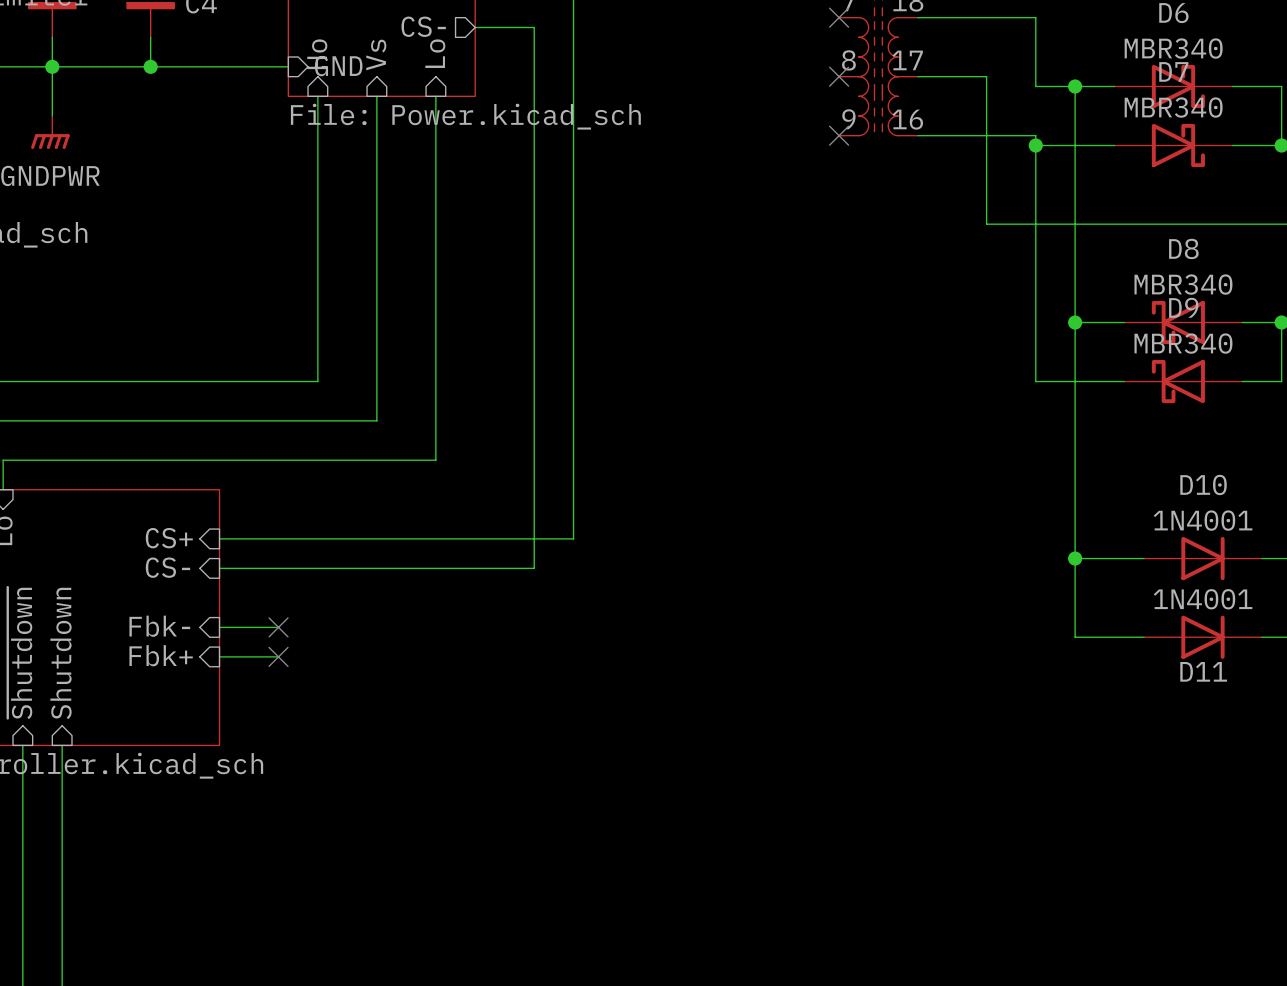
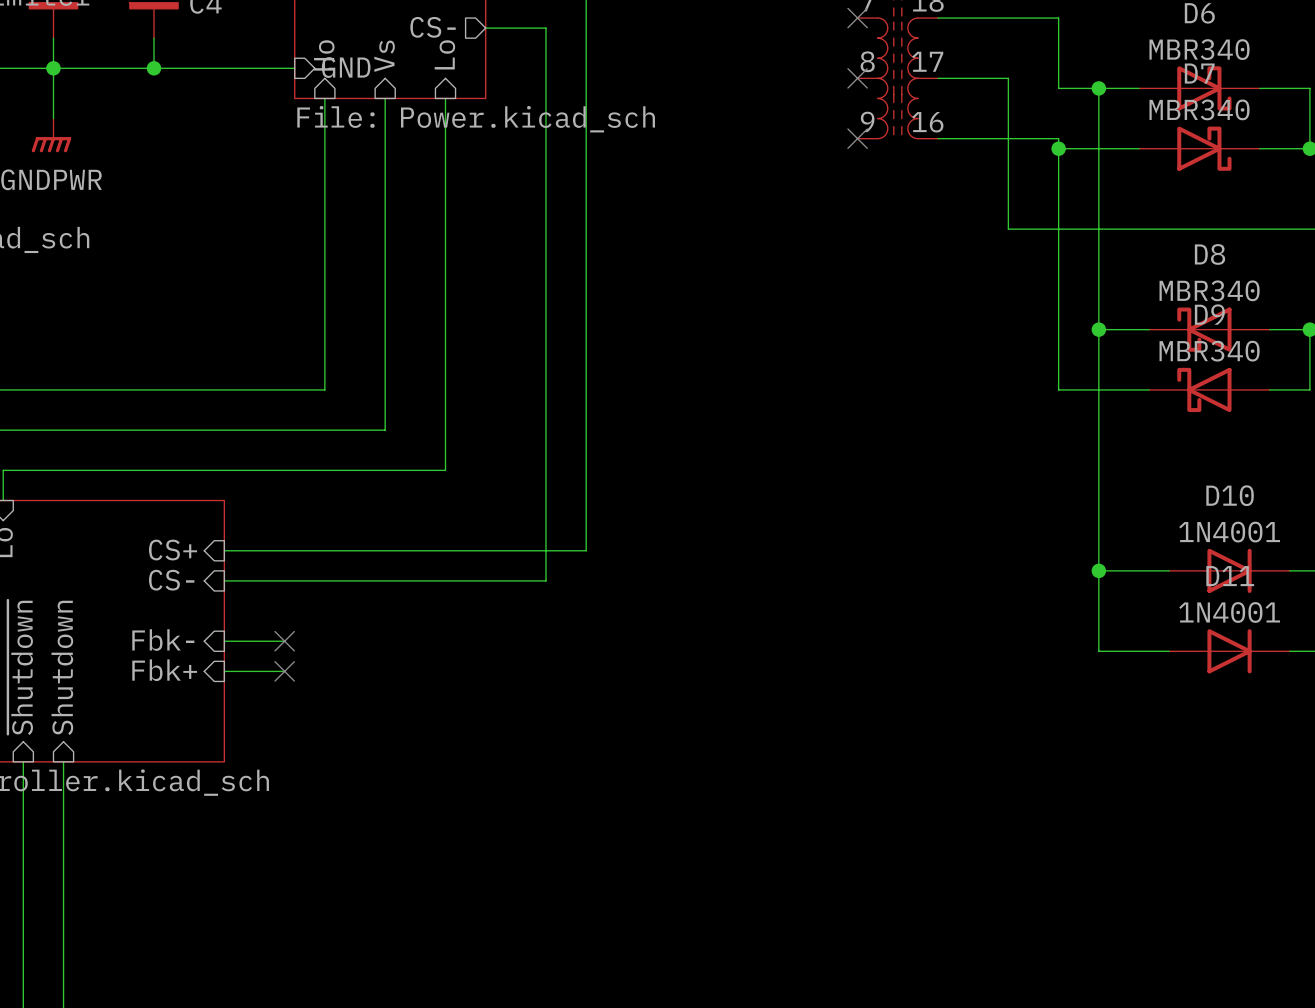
D11 name position: D11 (1203, 671) -> D11 (1230, 576)

